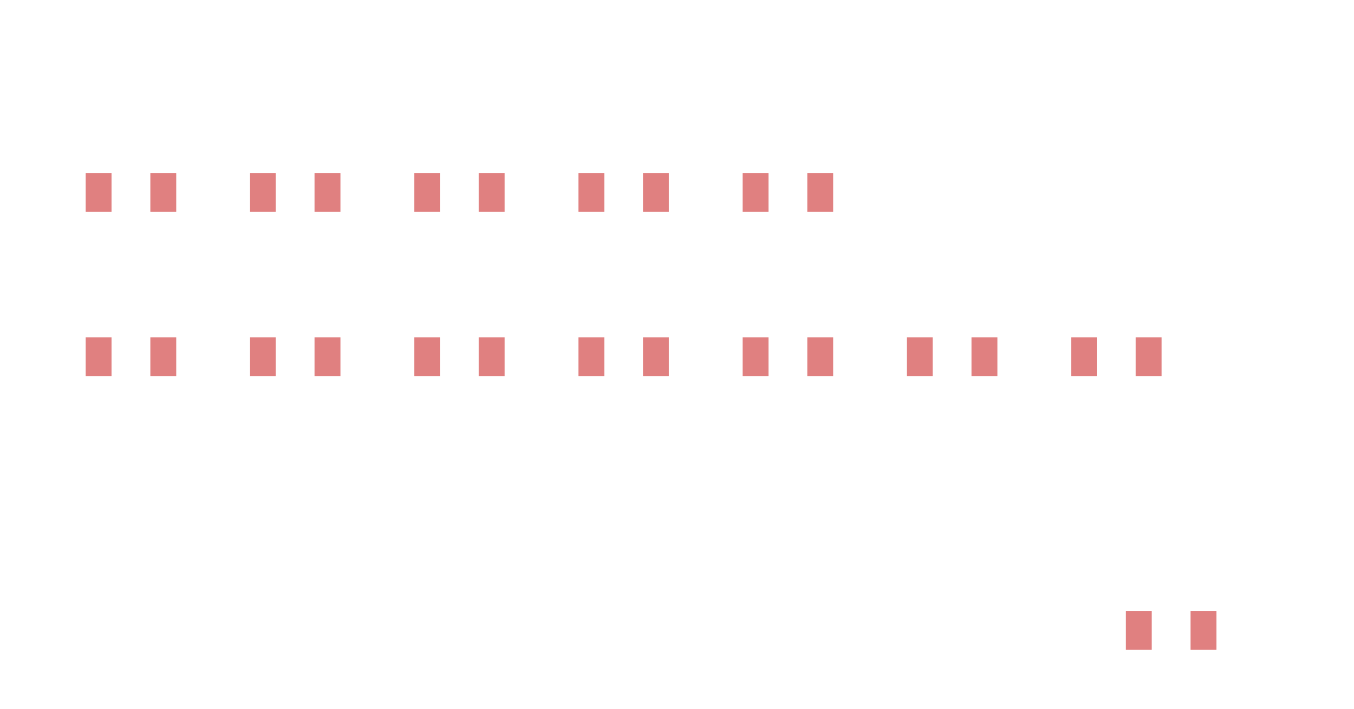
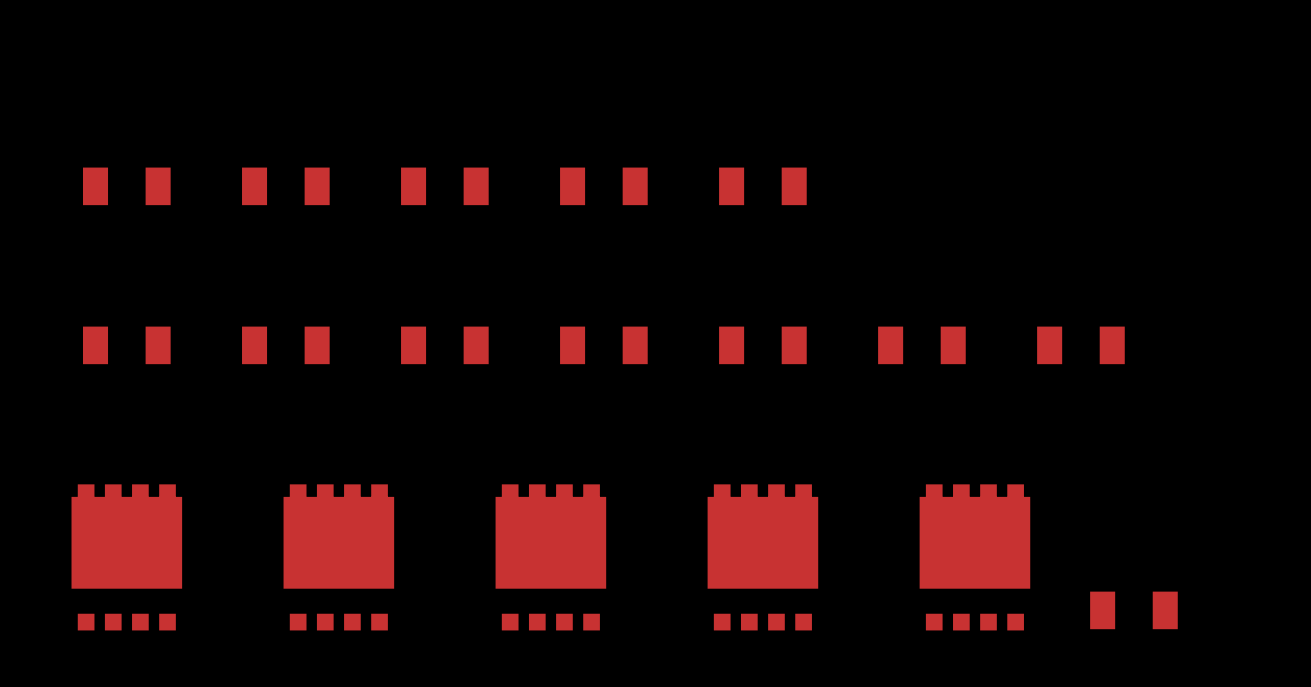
part: none -> (126, 557)
part: none -> (338, 557)
part: none -> (550, 557)
part: none -> (762, 557)
part: none -> (974, 557)

